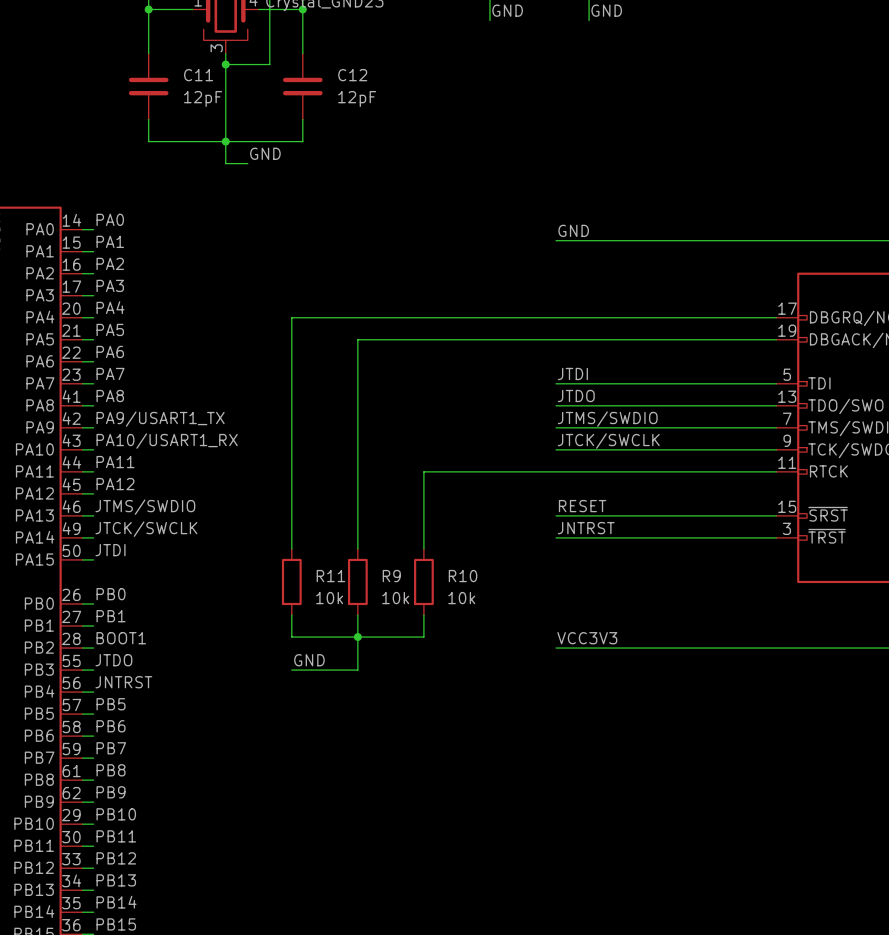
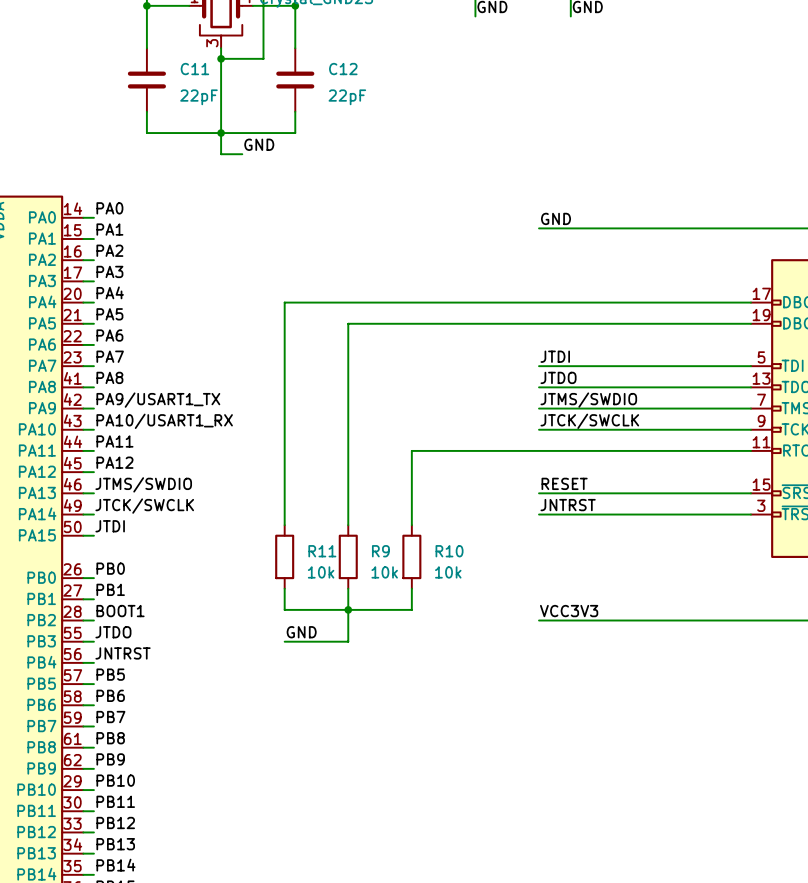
C11 value: 12pF (203, 98) -> 22pF (198, 97)
C12 value: 12pF (357, 98) -> 22pF (347, 97)

